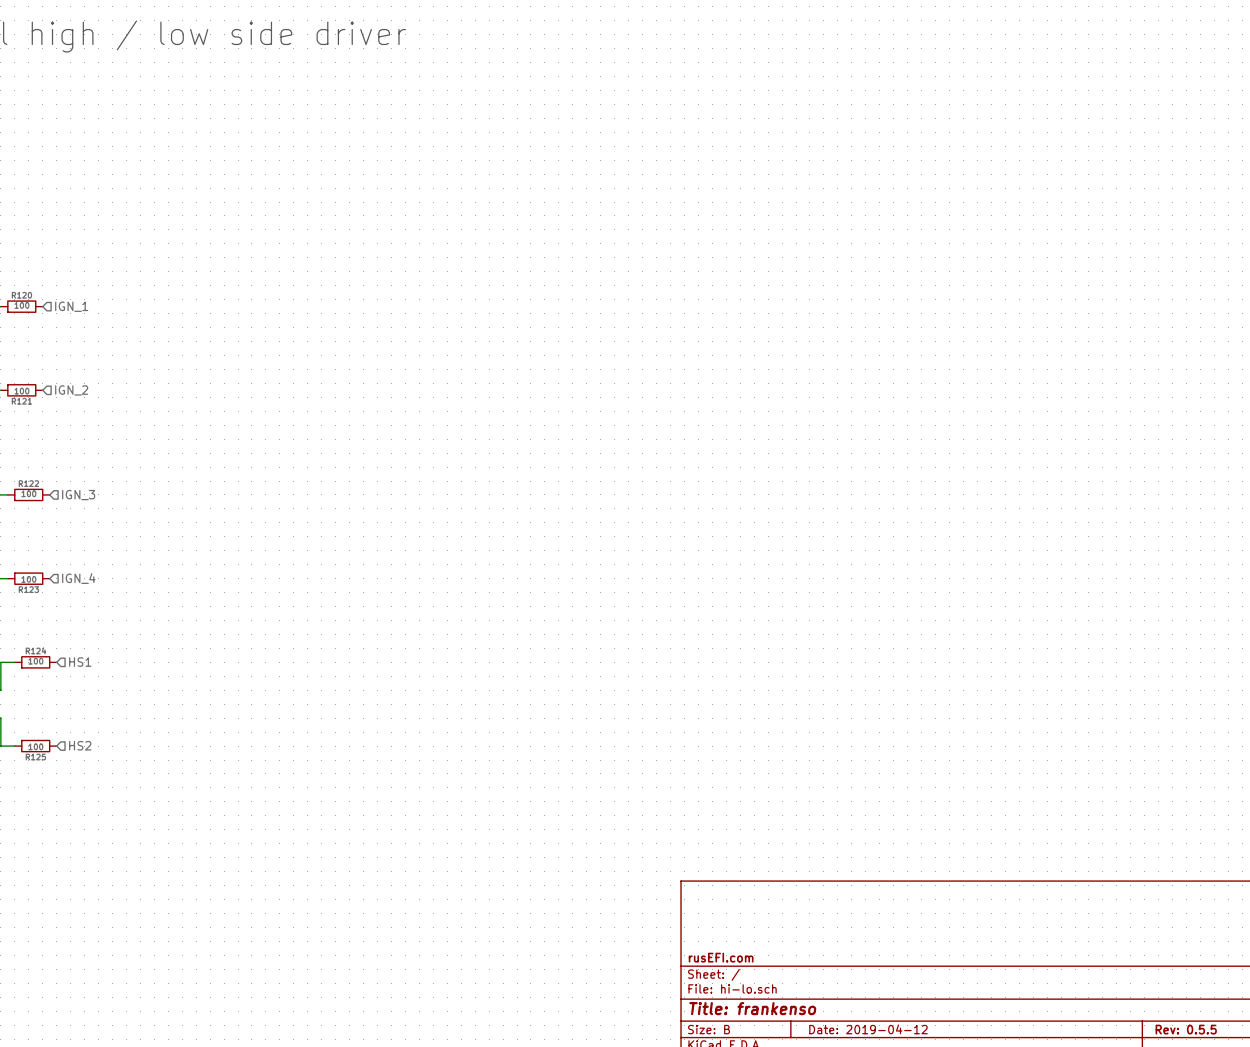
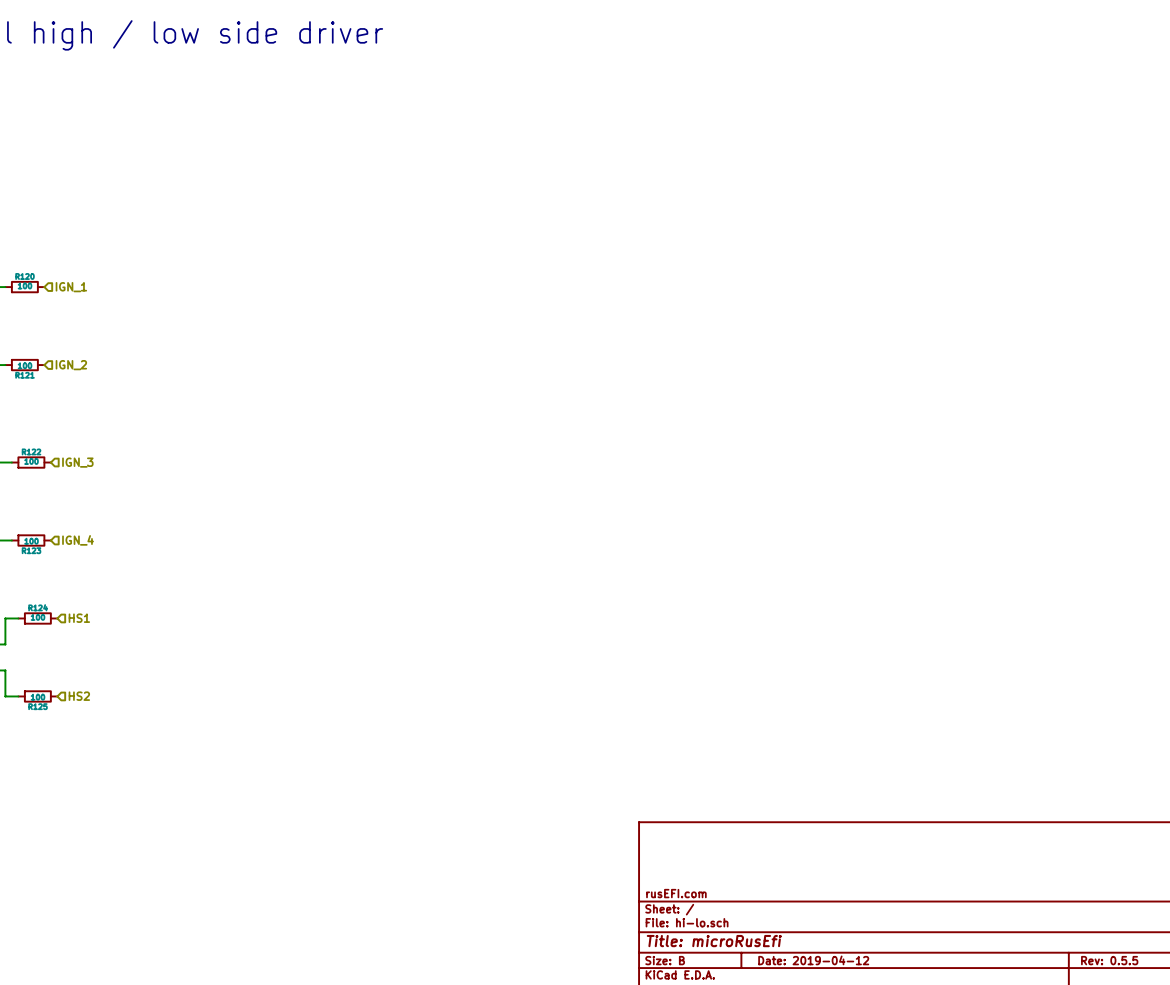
title block: Title: frankenso (752, 1008) -> Title: microRusEfi (714, 941)

